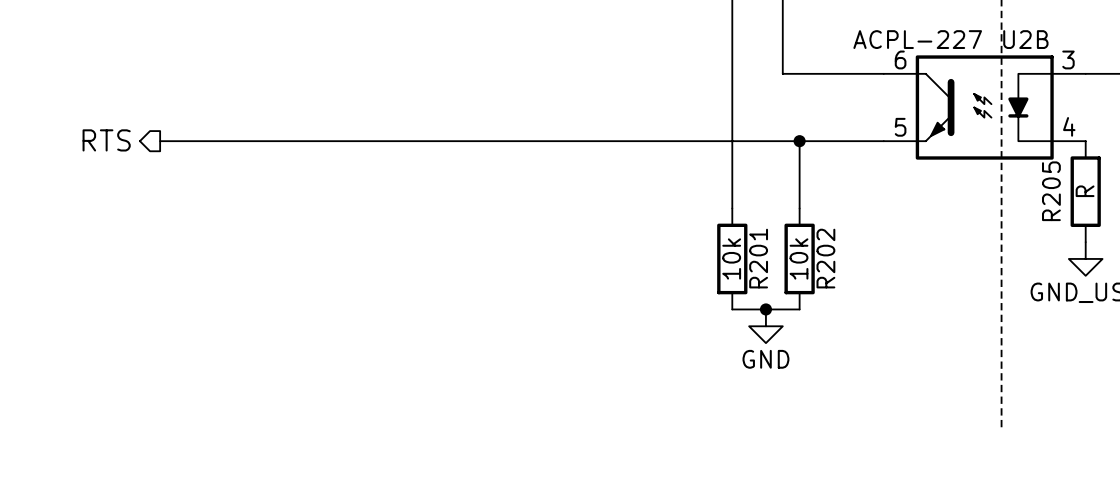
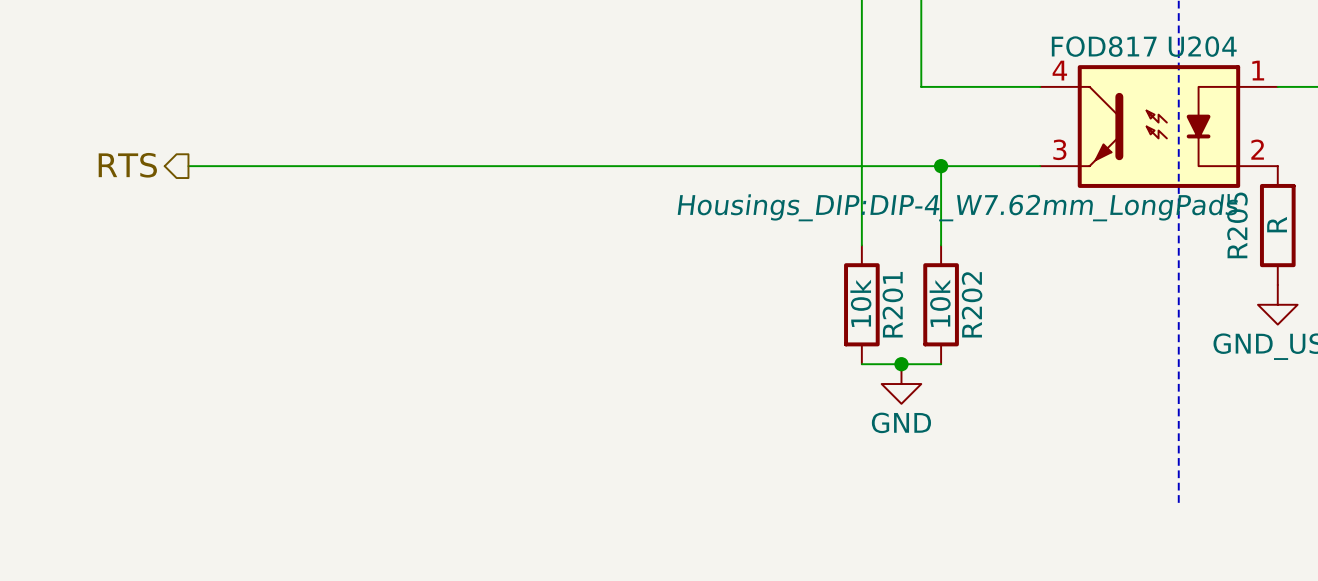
U2B value: ACPL-227 (917, 39) -> FOD817 (1104, 46)
U2B name: U2B (1025, 39) -> U204 (1202, 46)
U2B pin number: 6 (900, 59) -> 4 (1059, 70)
U2B pin number: 3 (1068, 59) -> 1 (1258, 70)
U2B pin number: 4 (1069, 126) -> 2 (1257, 149)
U2B pin number: 5 (900, 127) -> 3 (1059, 149)
U2B text: none -> Housings_DIP:DIP-4_W7.62mm_LongPads (957, 207)

